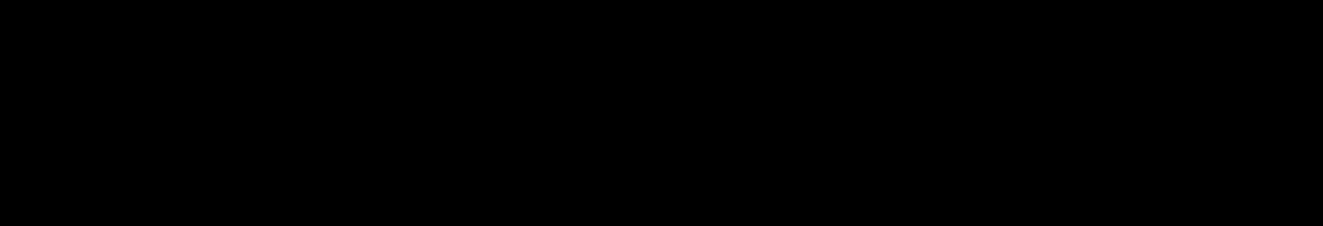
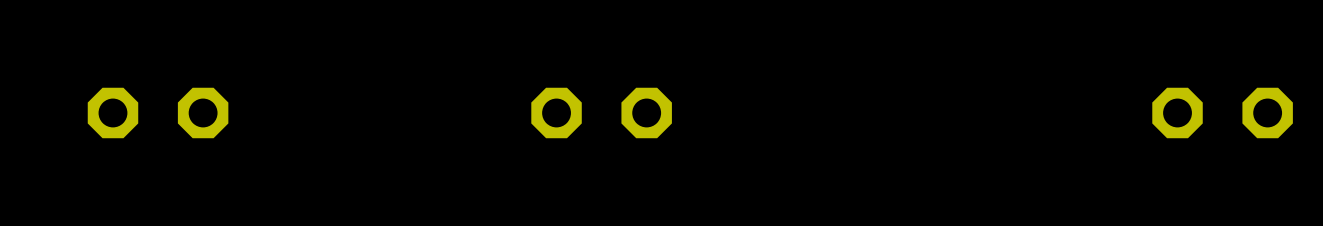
part: none -> (158, 112)
part: none -> (601, 112)
part: none -> (1222, 112)

